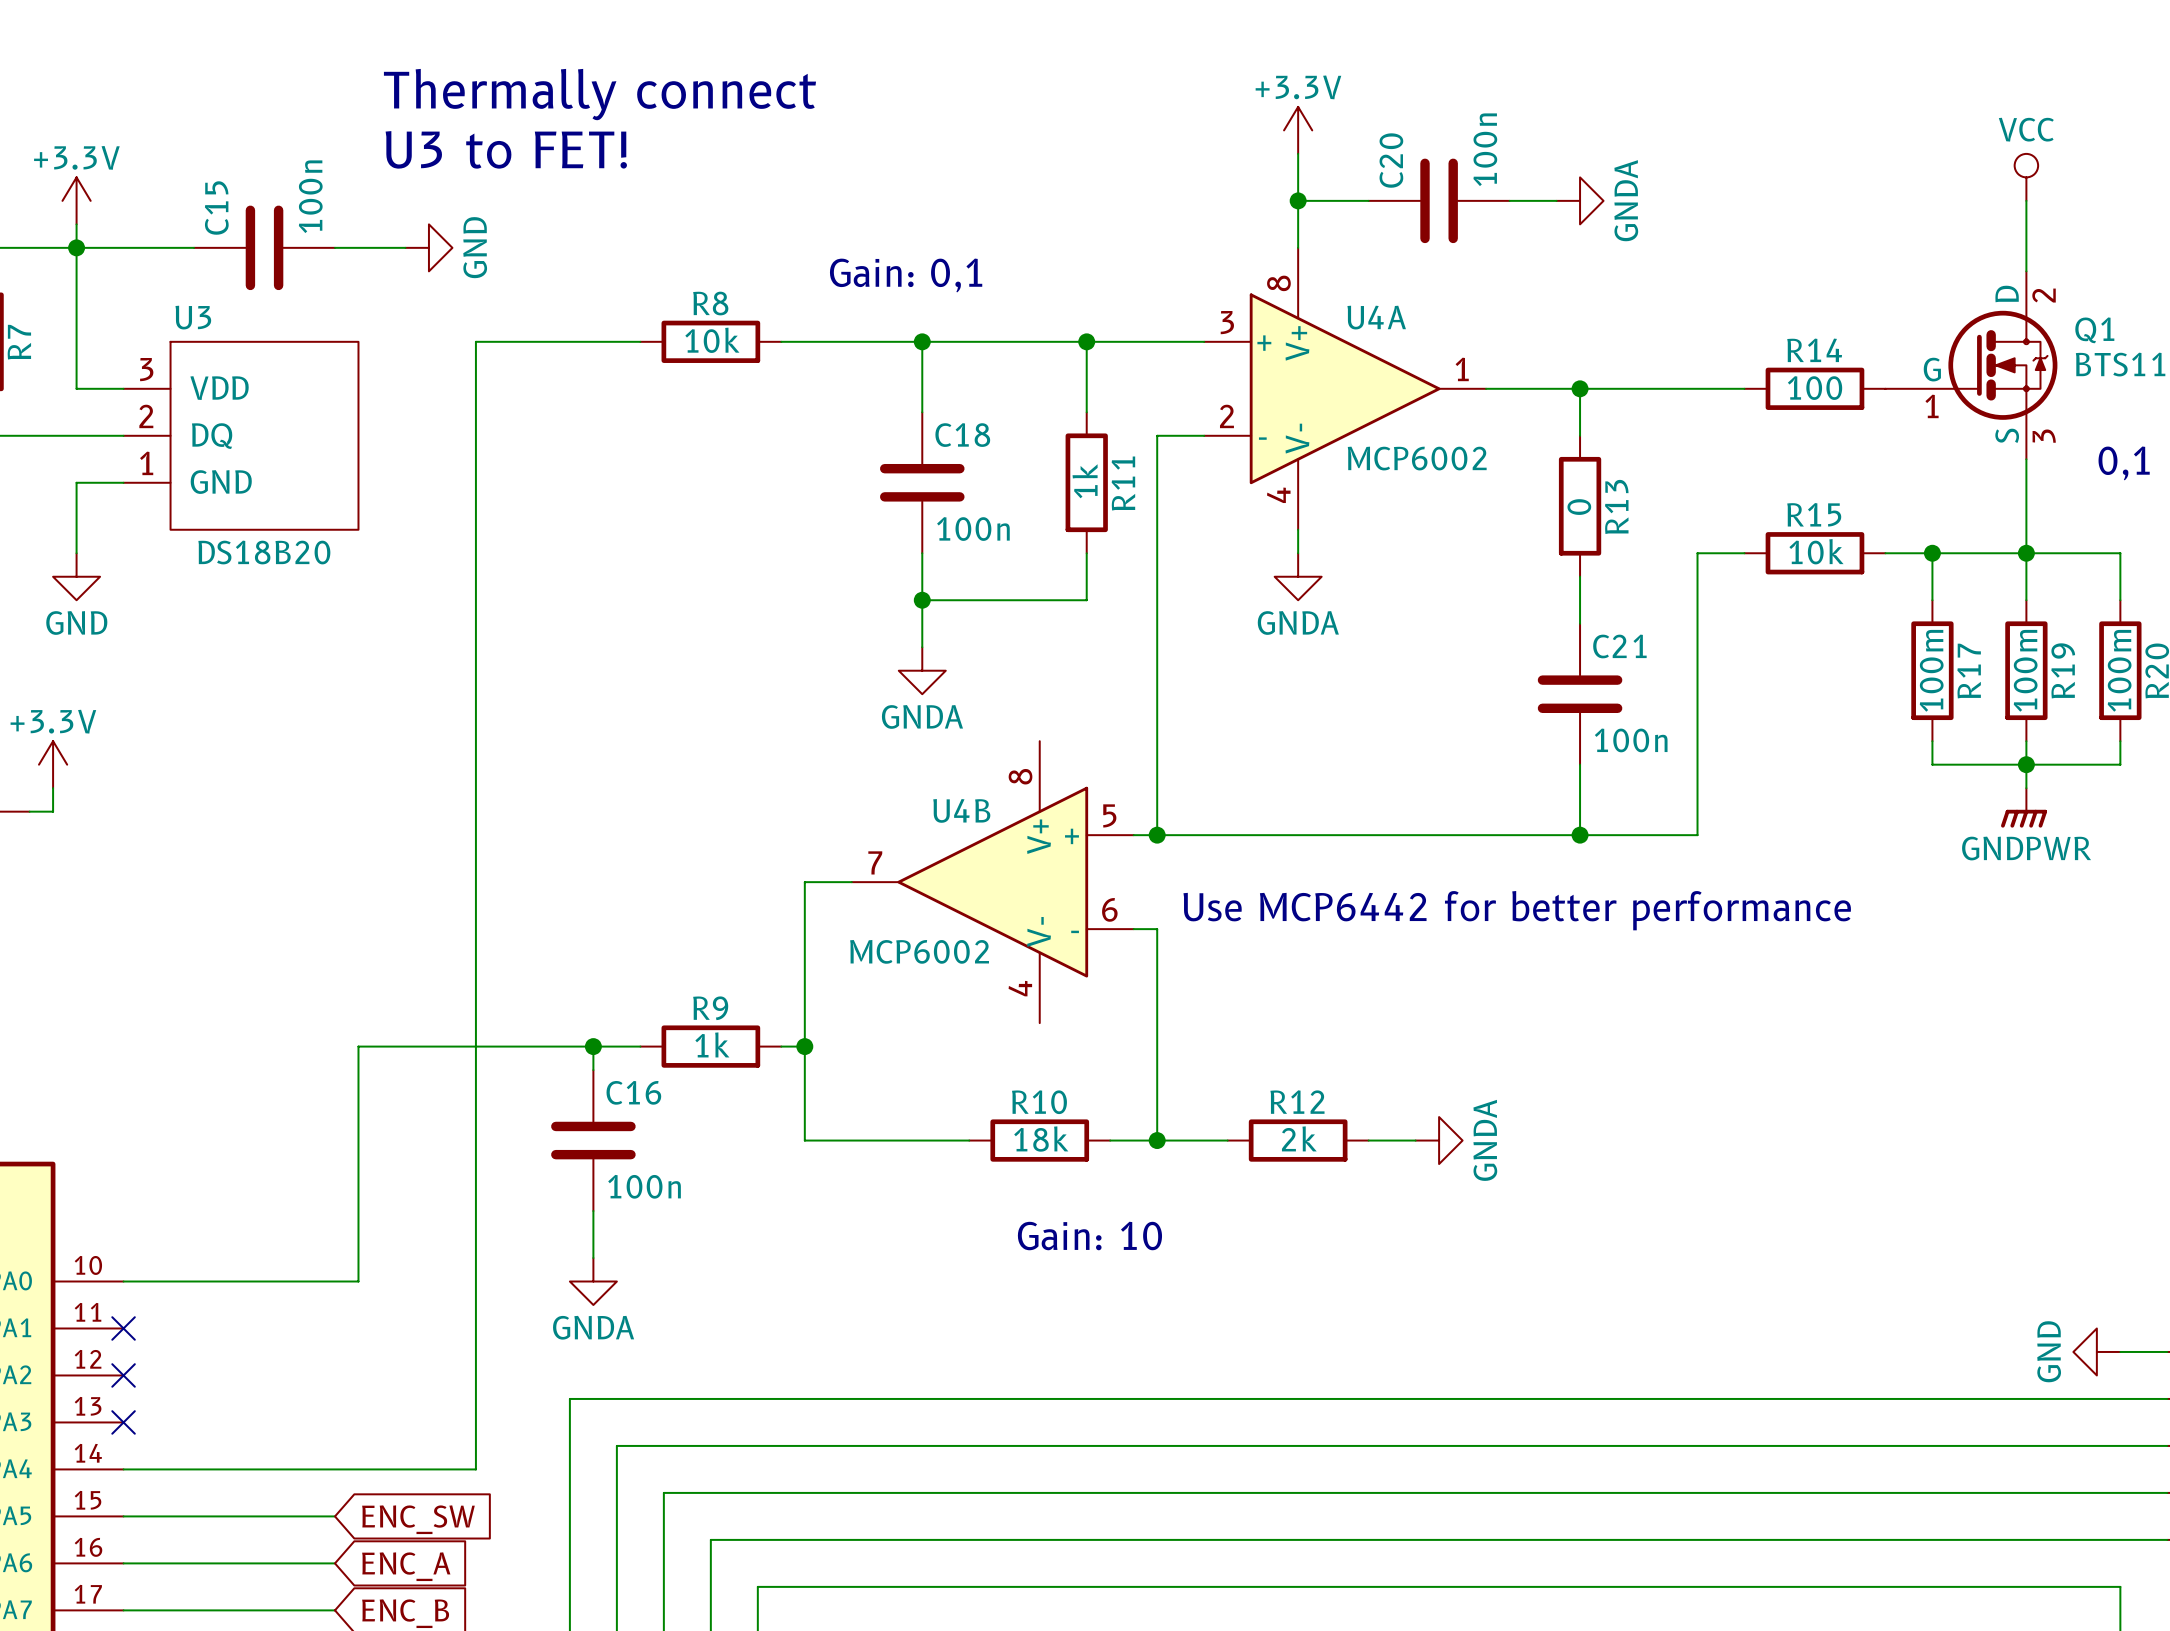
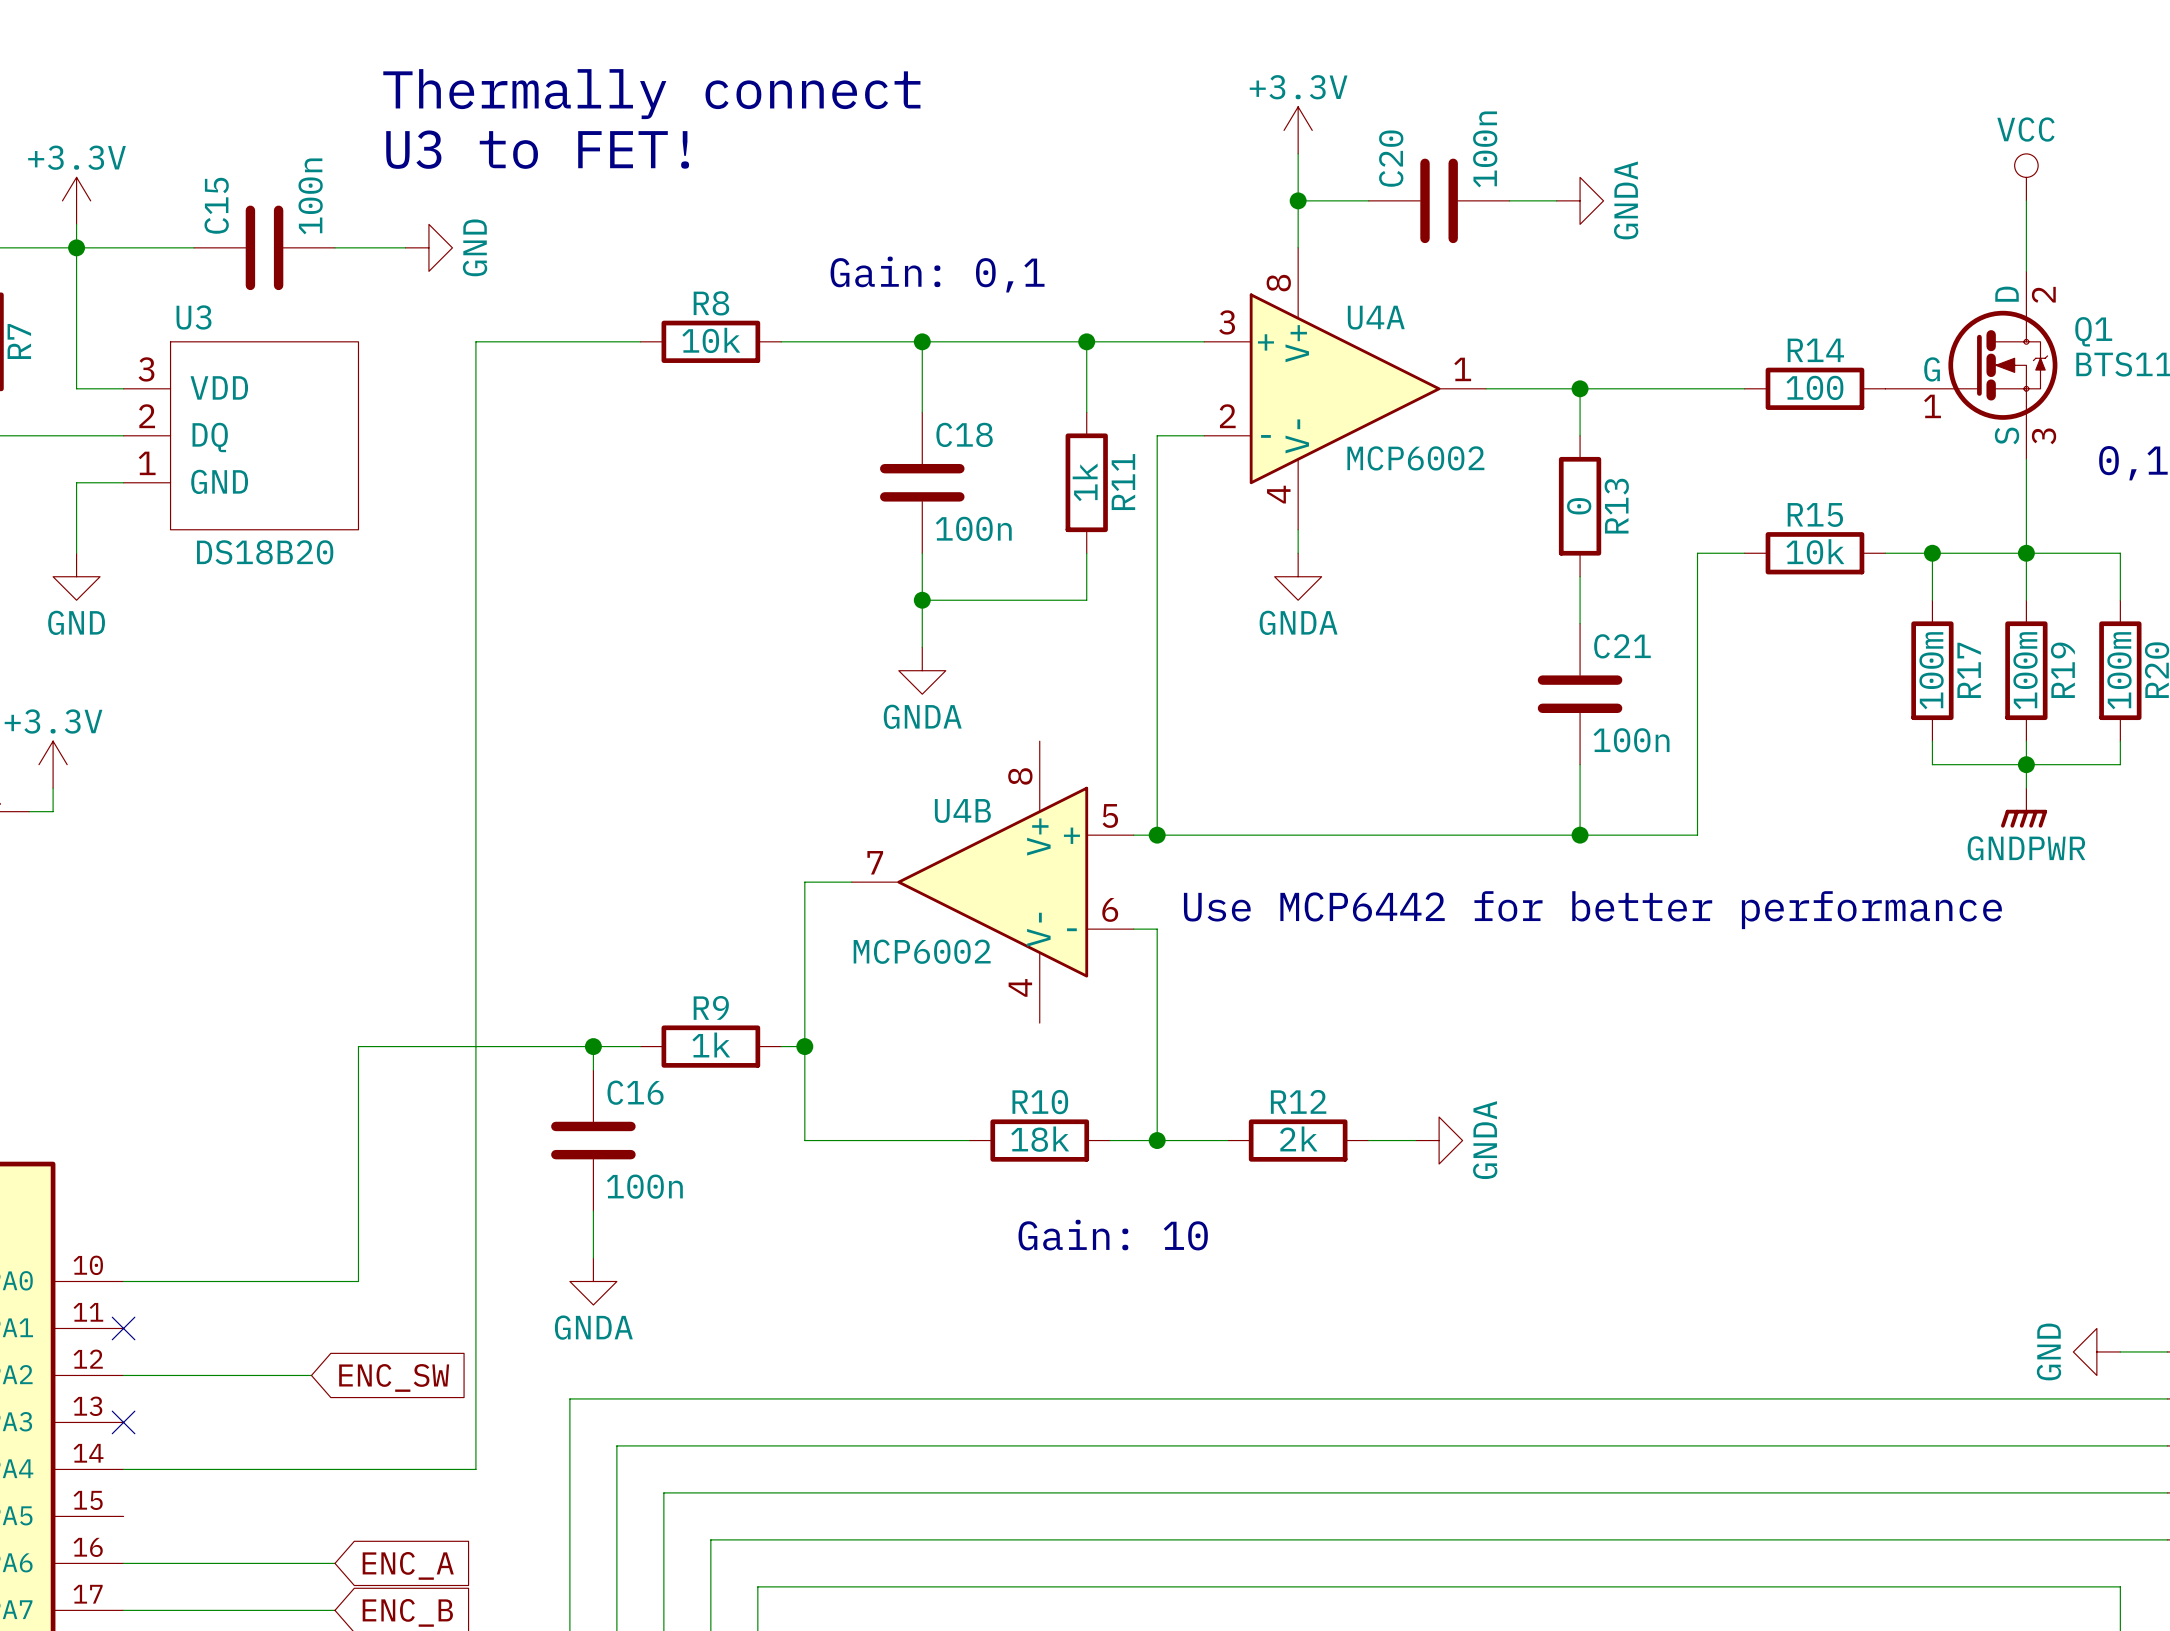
wire: none -> (123, 1375) (311, 1375)
no-connect mark: (123, 1375) -> none
wire: (123, 1516) (334, 1516) -> none
global label position: ENC_SW (418, 1519) -> ENC_SW (394, 1377)

